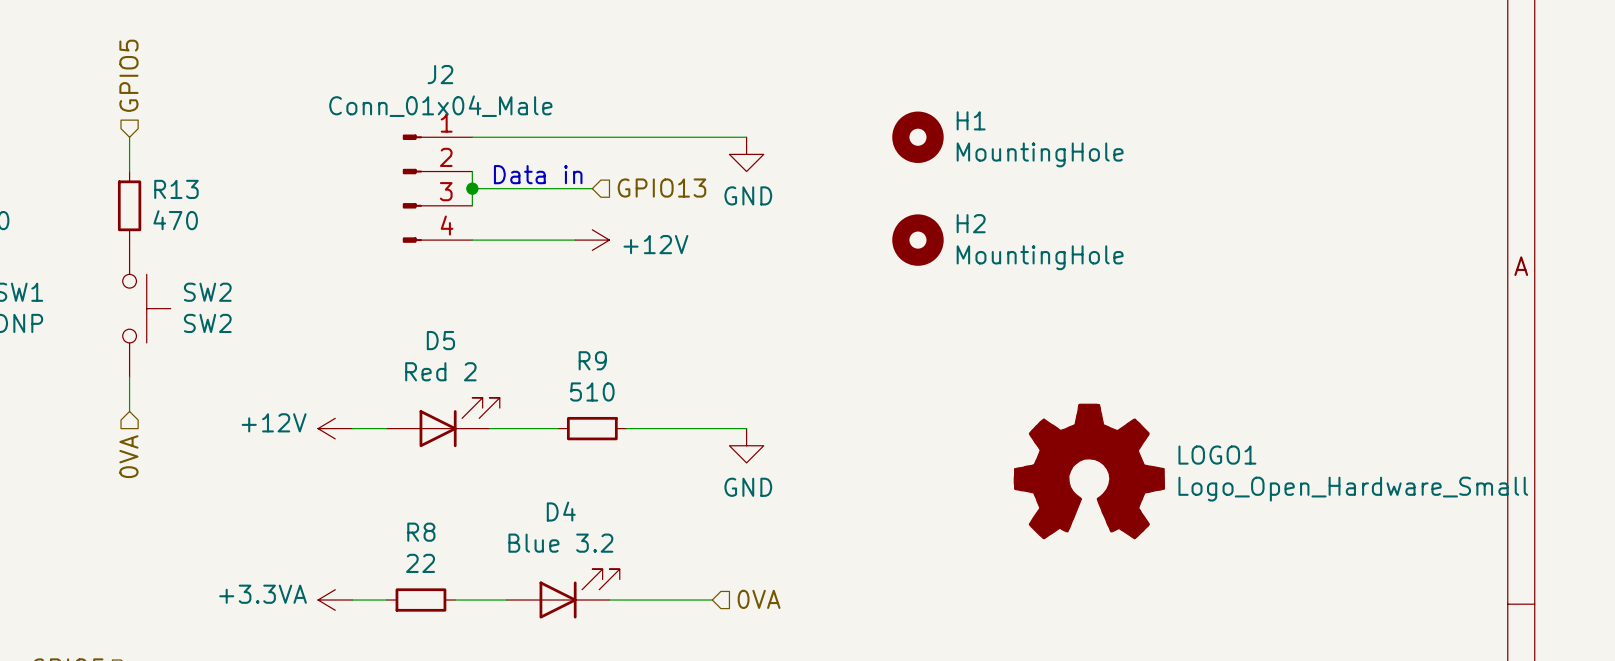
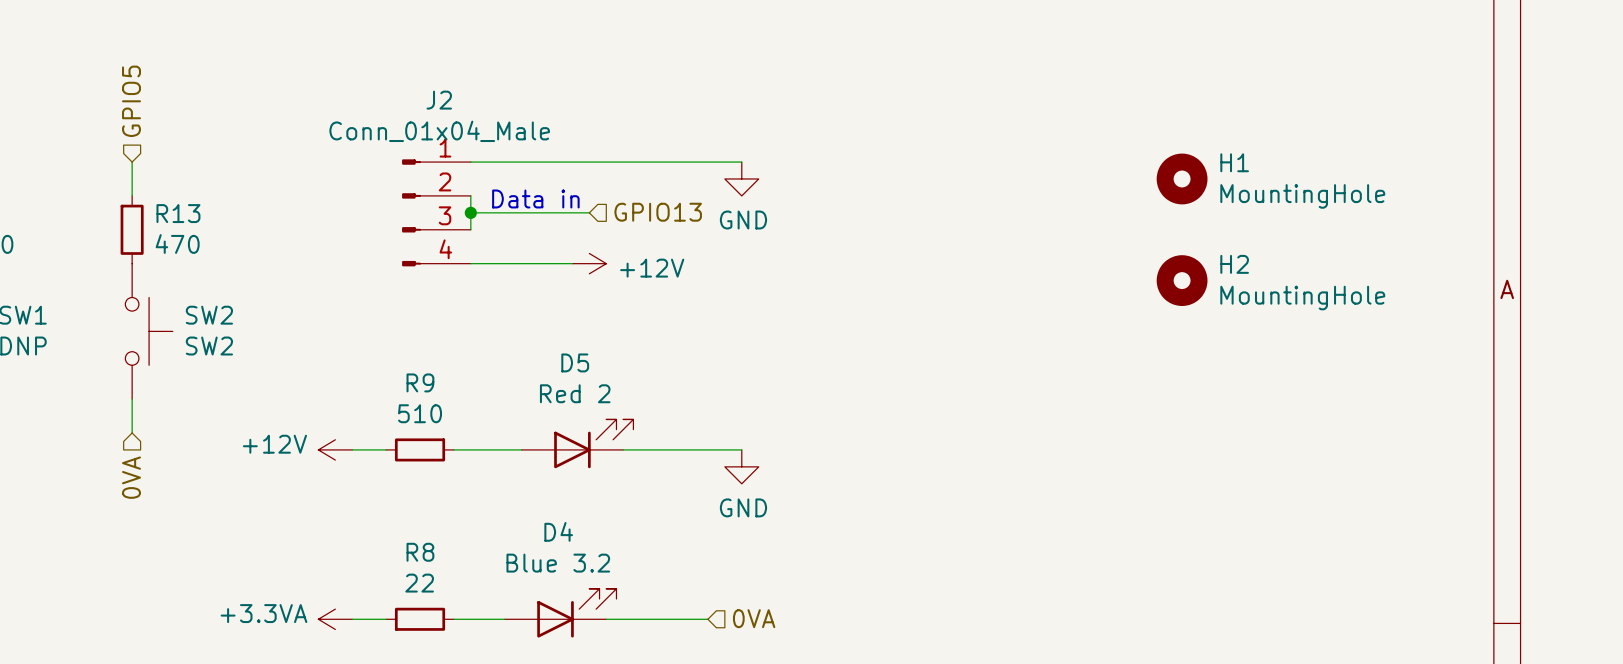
H1 position: (917, 137) -> (1182, 178)
H2 position: (917, 240) -> (1182, 280)
D5 position: (443, 422) -> (577, 443)
R9 position: (592, 428) -> (420, 449)
LOGO1: Logo_Open_Hardware_Small (1089, 471) -> none

